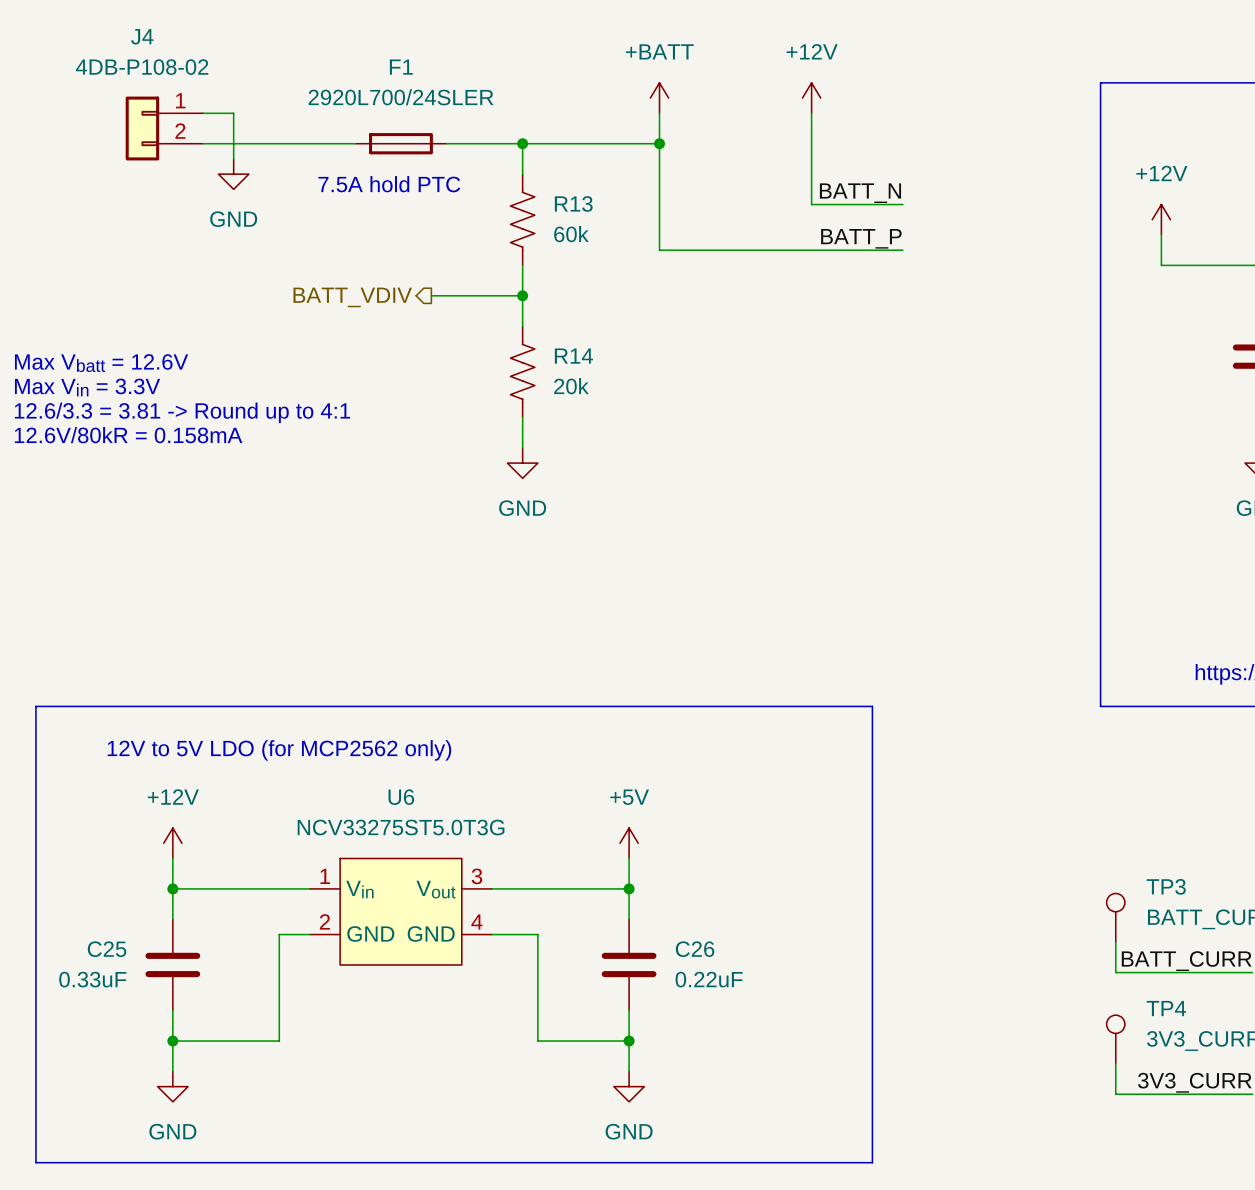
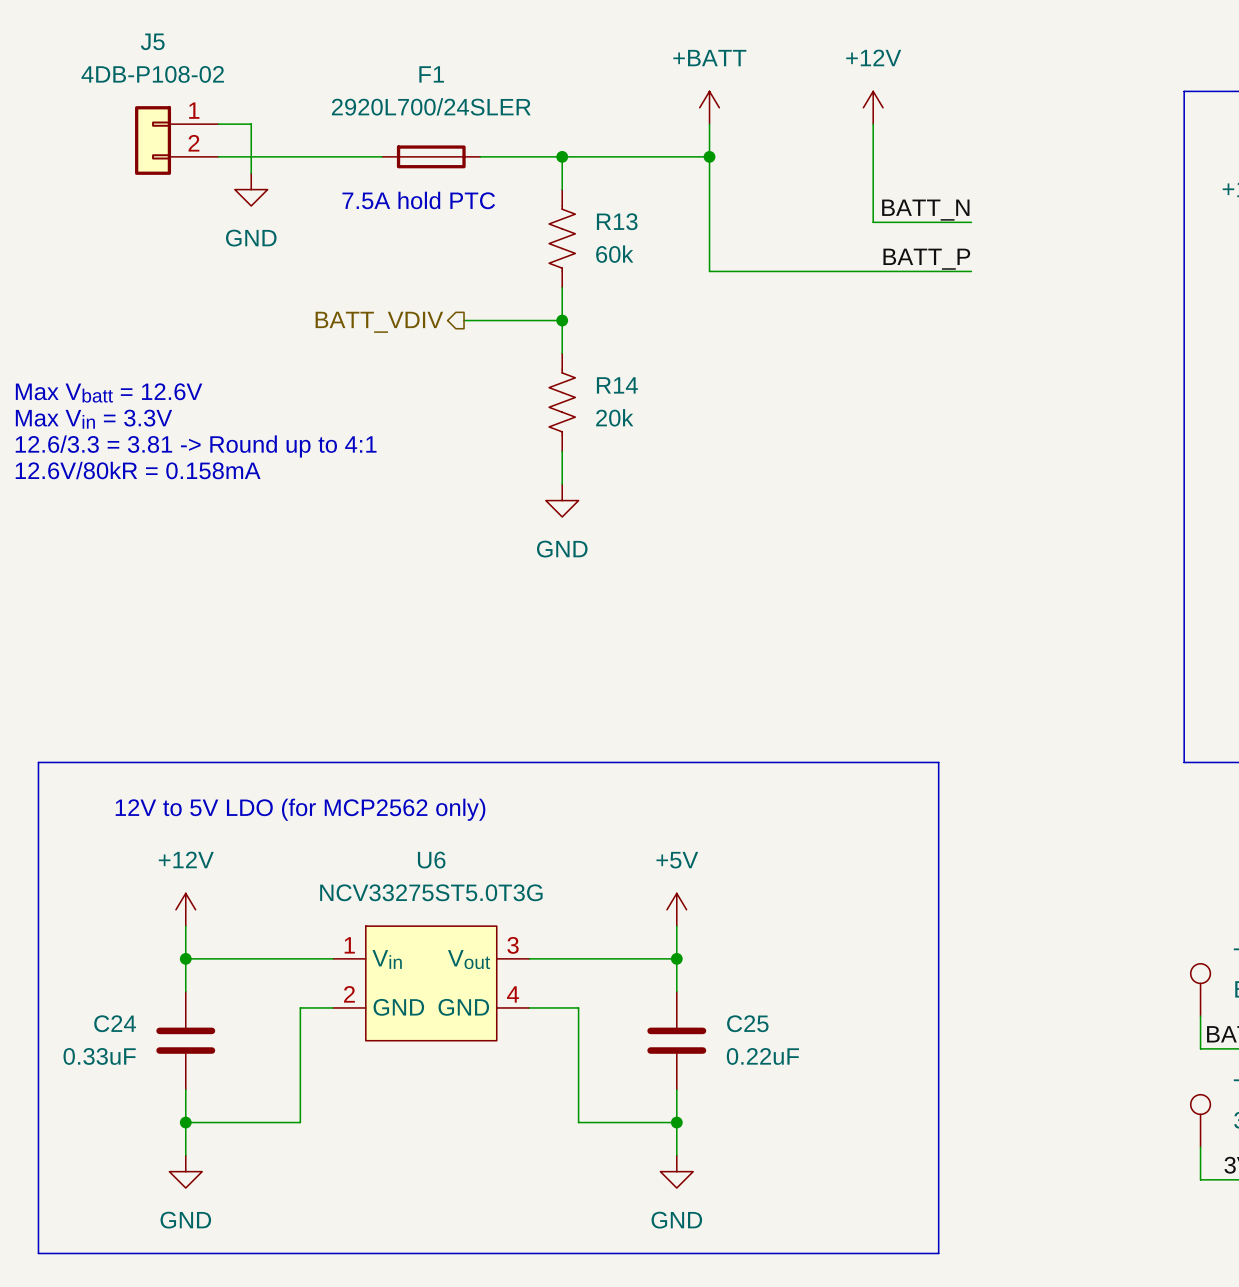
J4 name: J4 (142, 36) -> J5 (152, 41)
C25 name: C25 (107, 949) -> C24 (115, 1023)
C26 name: C26 (695, 949) -> C25 (747, 1023)

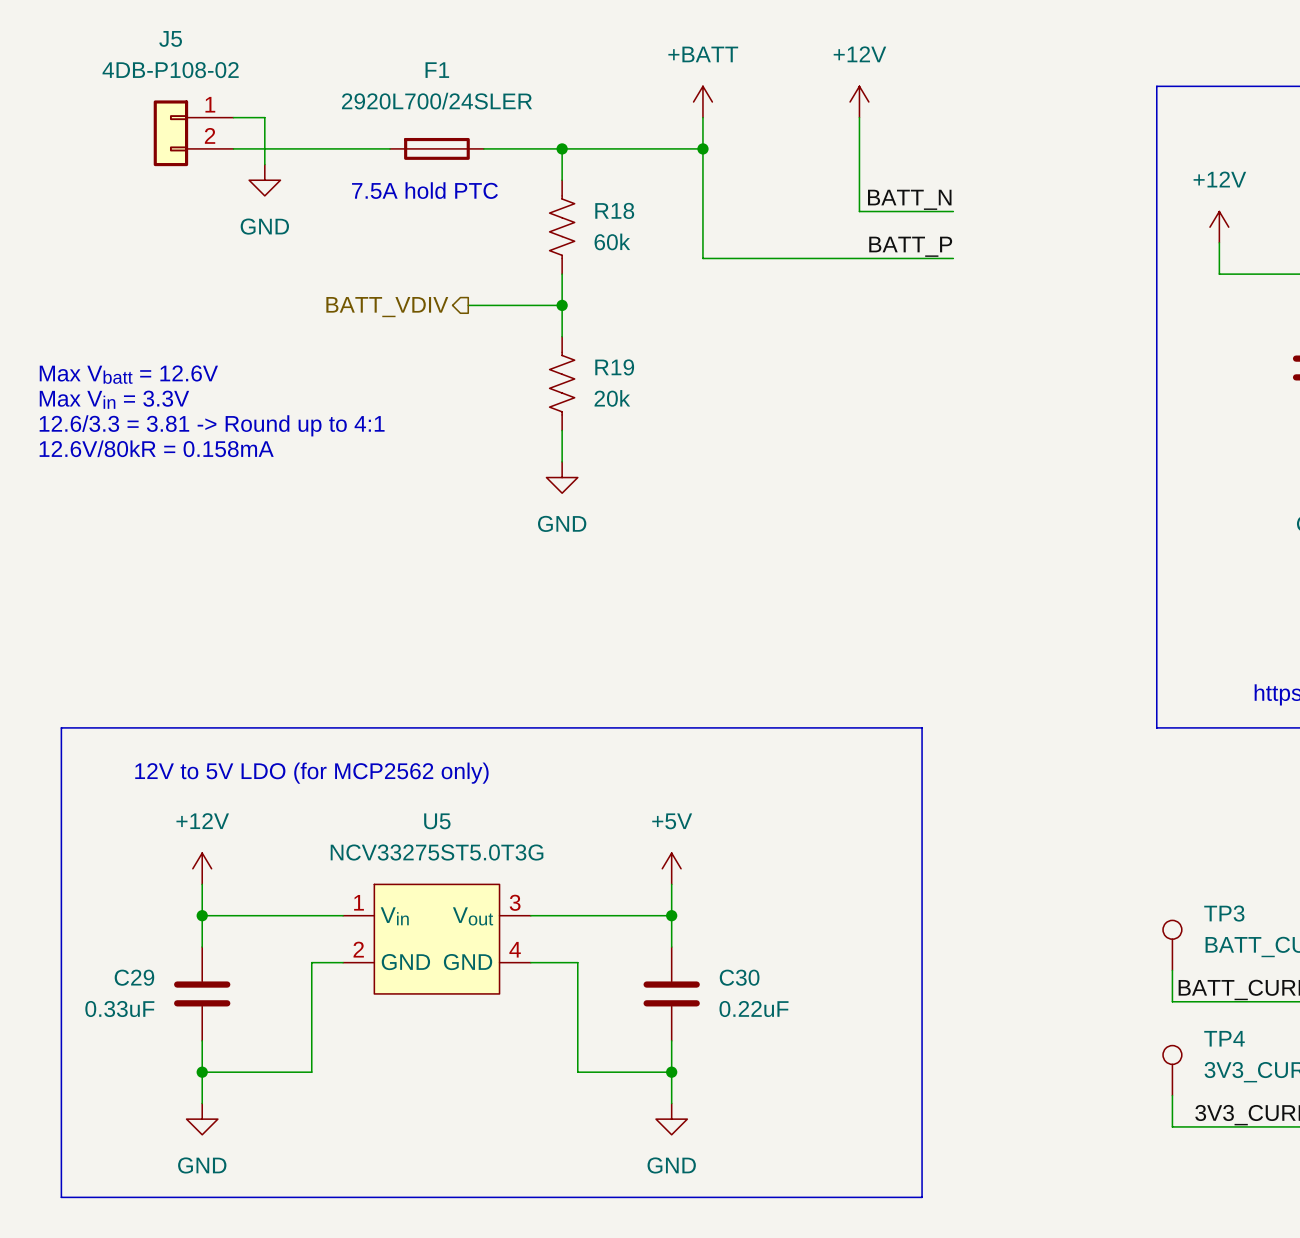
R13 name: R13 (617, 221) -> R18 (614, 210)
R14 name: R14 (617, 385) -> R19 (614, 367)
U6 name: U6 (431, 860) -> U5 (437, 821)
C24 name: C24 (115, 1023) -> C29 (134, 977)
C25 name: C25 (747, 1023) -> C30 (739, 977)

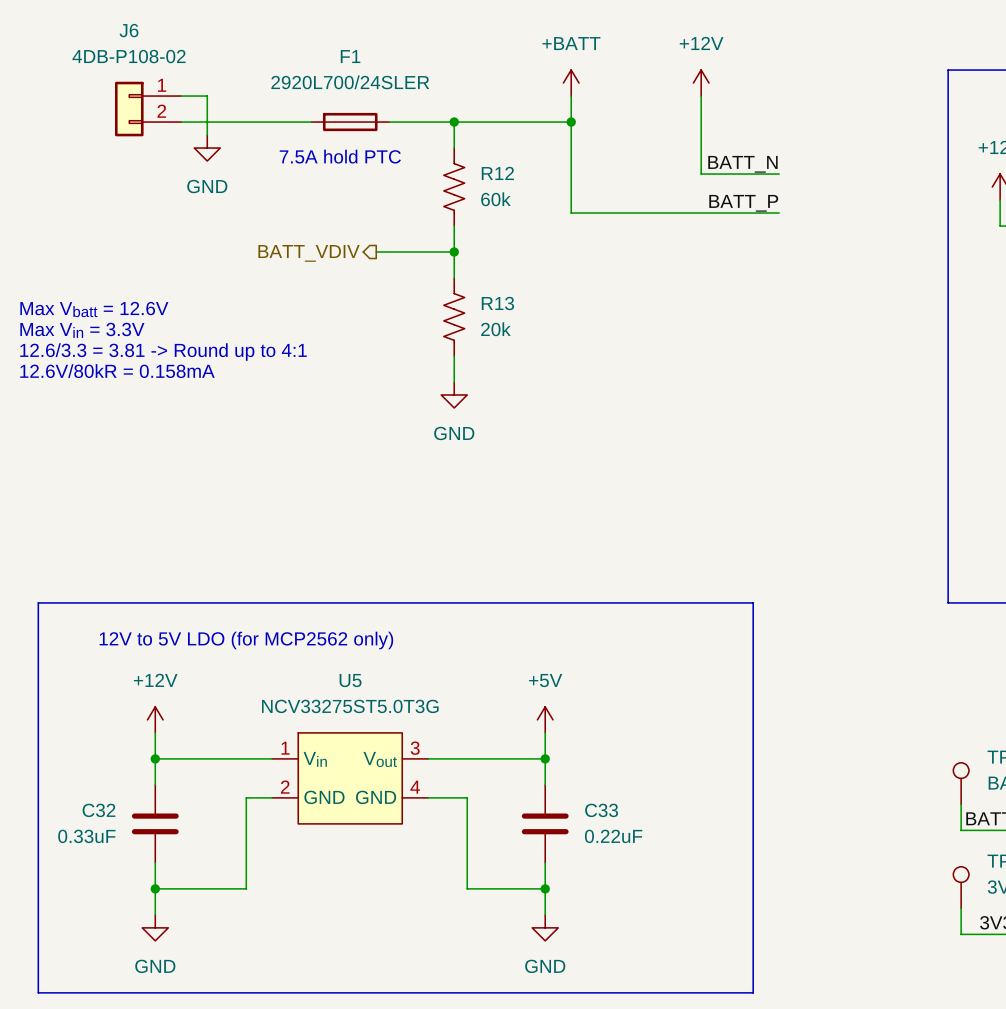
J5 name: J5 (170, 38) -> J6 (129, 30)
R18 name: R18 (614, 210) -> R12 (497, 173)
R19 name: R19 (614, 367) -> R13 (497, 303)
C29 name: C29 (134, 977) -> C32 (98, 810)
C30 name: C30 (739, 977) -> C33 (601, 810)

